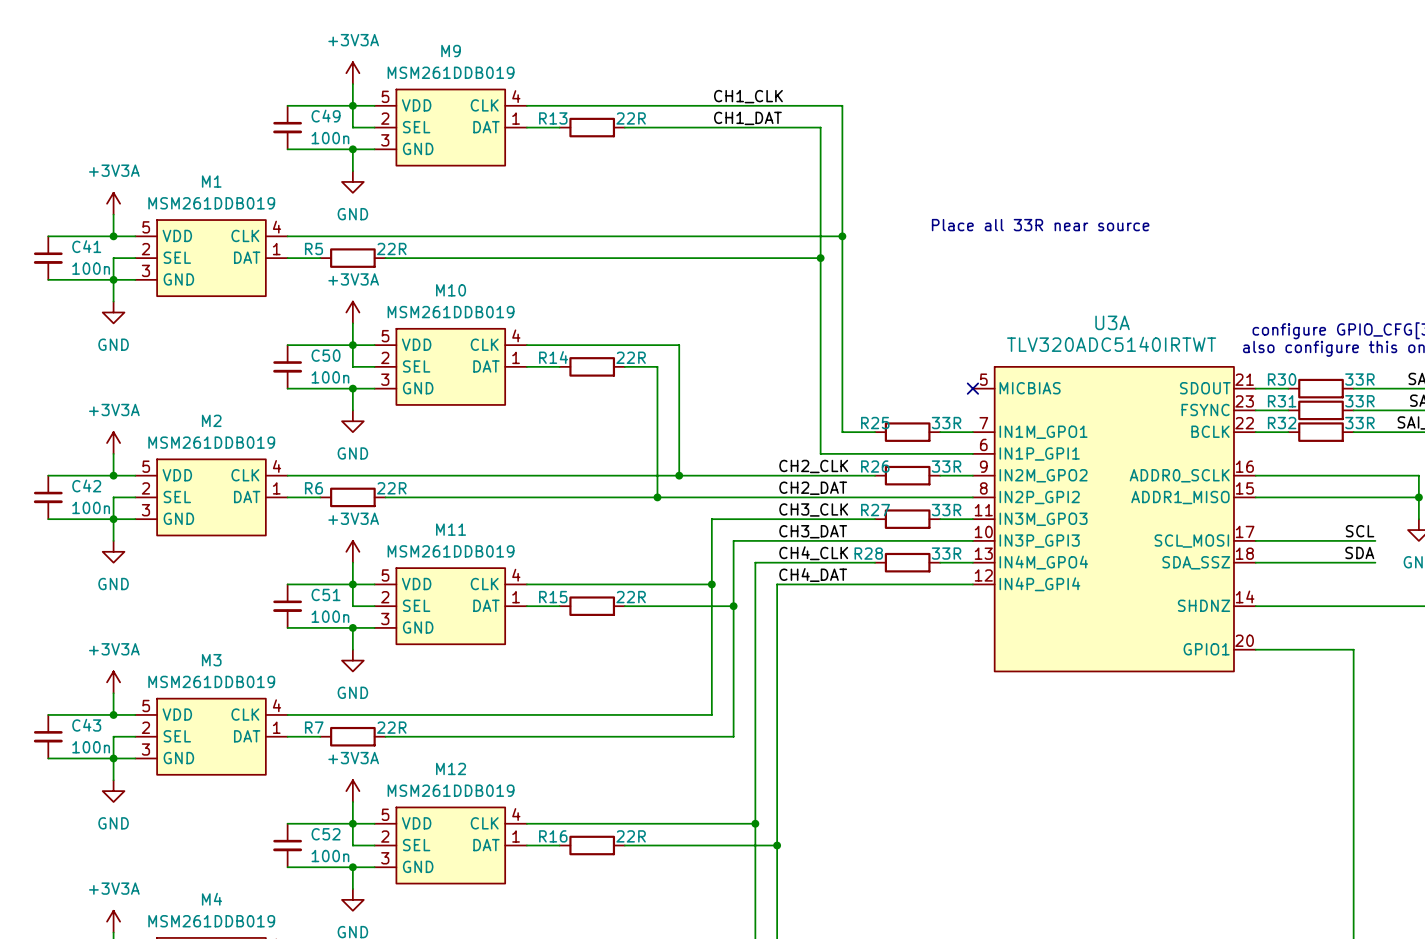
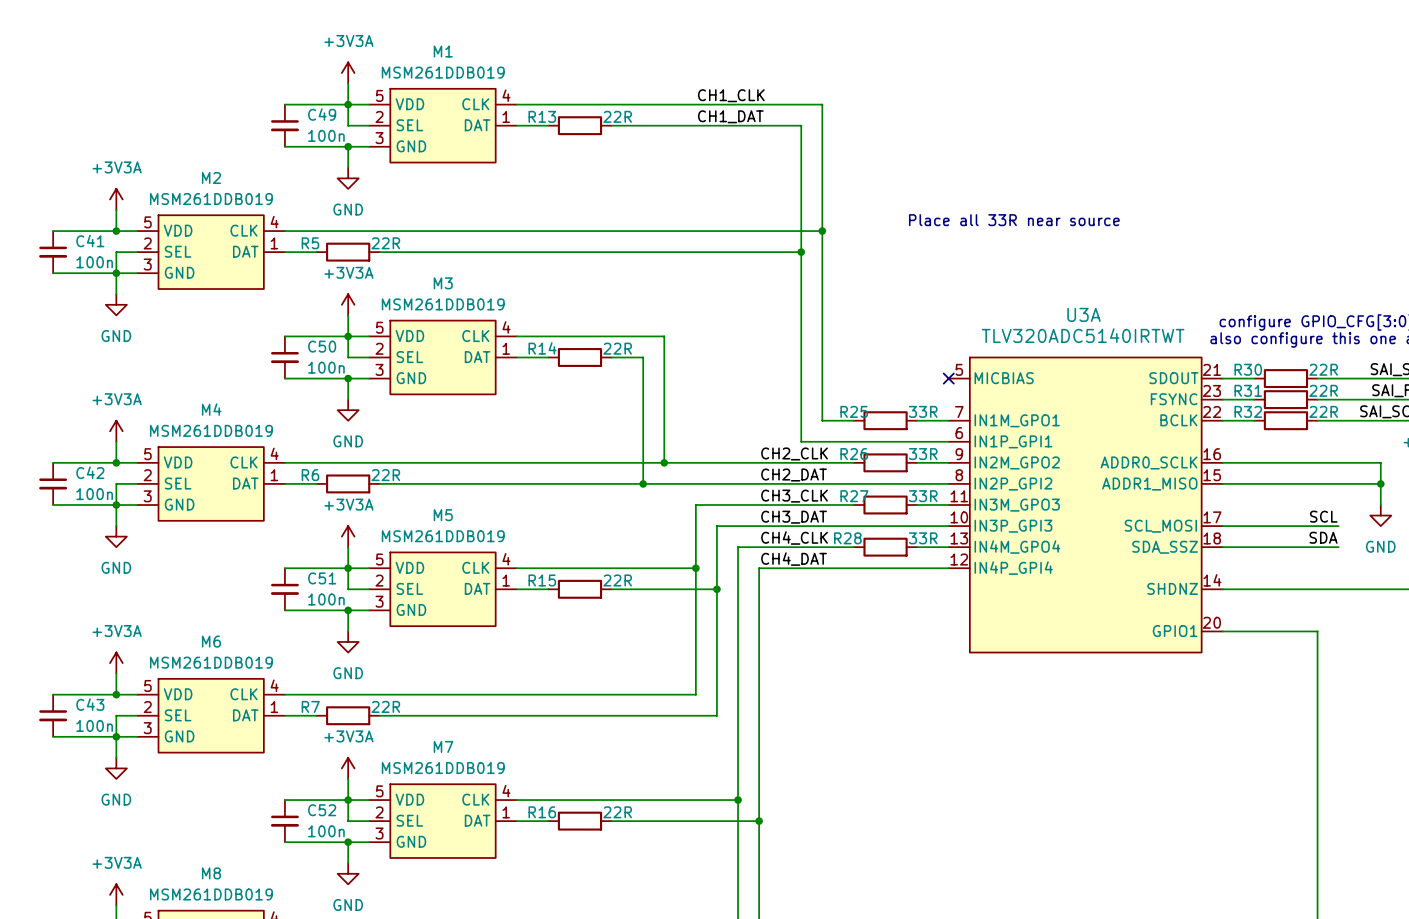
M9 name: M9 (451, 51) -> M1 (443, 51)
M1 name: M1 (211, 181) -> M2 (211, 177)
M10 name: M10 (451, 290) -> M3 (443, 283)
R30 value: 33R (1359, 379) -> 22R (1323, 369)
R31 value: 33R (1359, 401) -> 22R (1323, 390)
M2 name: M2 (211, 420) -> M4 (211, 409)
R32 value: 33R (1359, 423) -> 22R (1323, 411)
M11 name: M11 (451, 529) -> M5 (443, 515)
M3 name: M3 (211, 660) -> M6 (211, 641)
M12 name: M12 (451, 768) -> M7 (443, 746)
M4 name: M4 (211, 899) -> M8 (211, 873)

